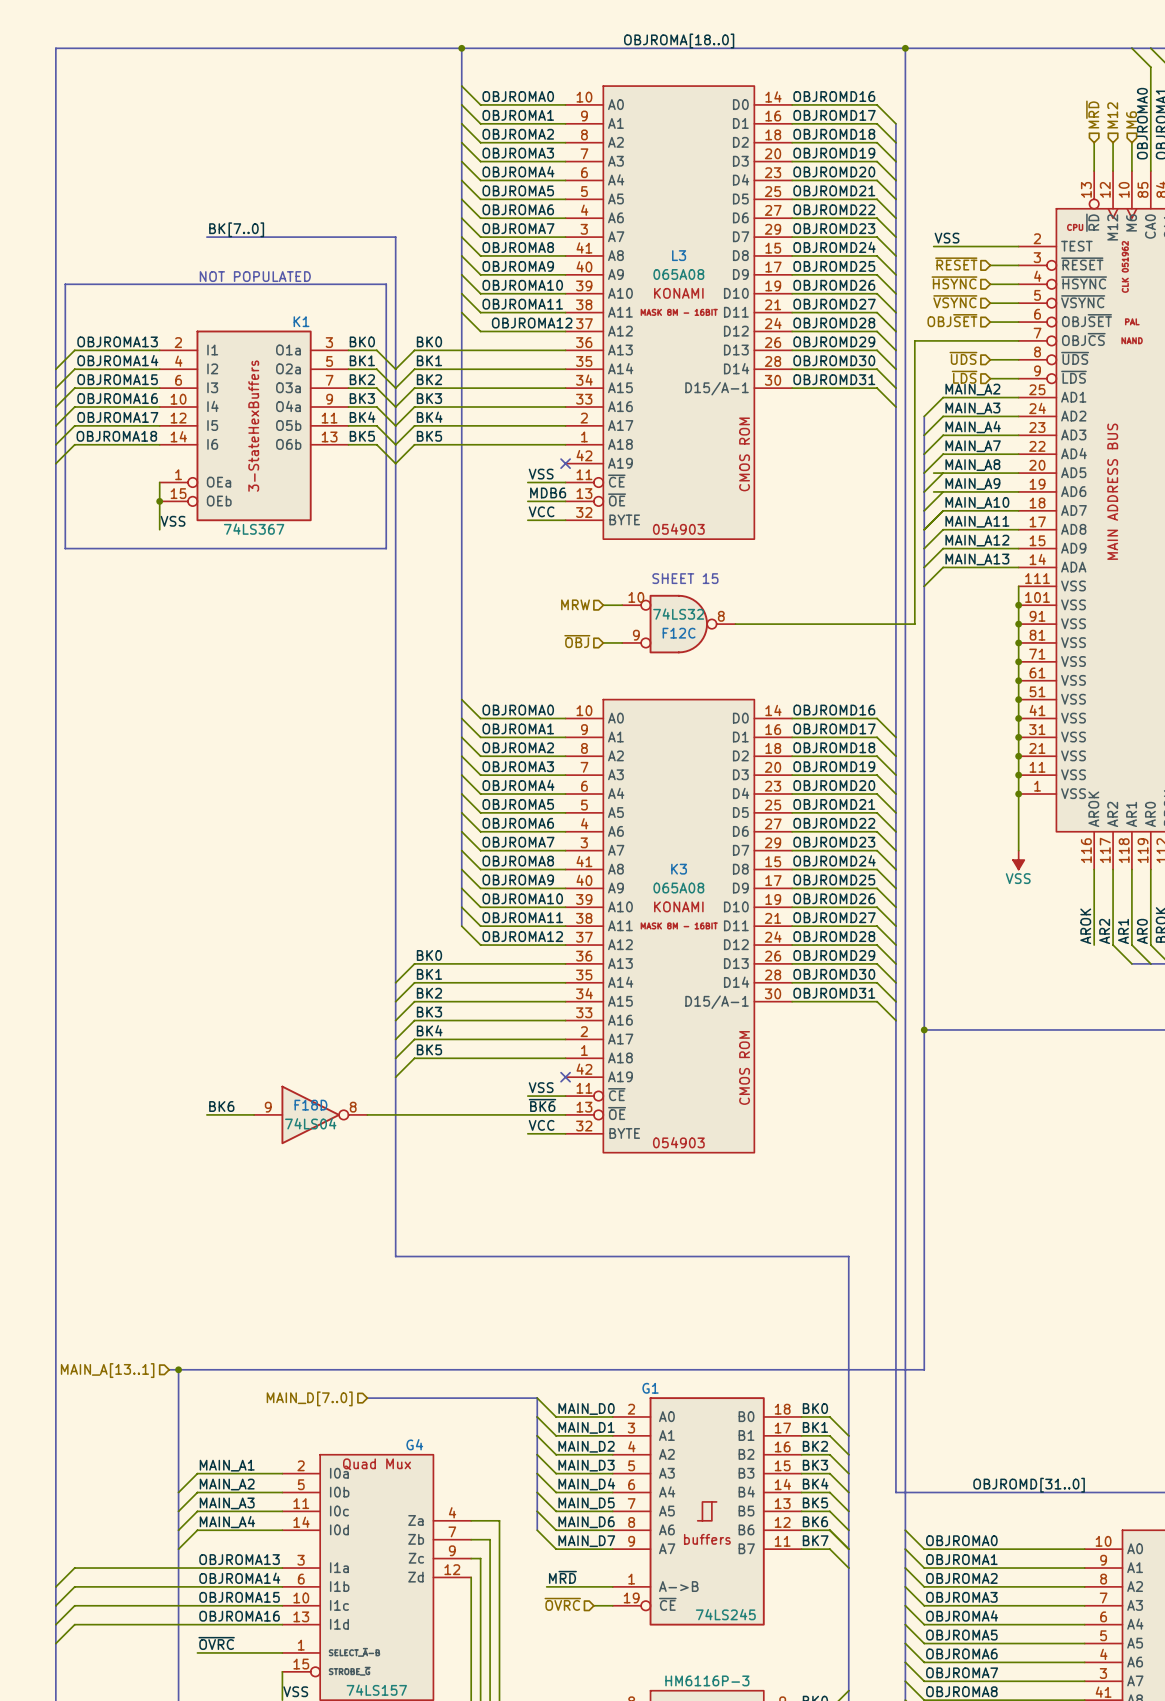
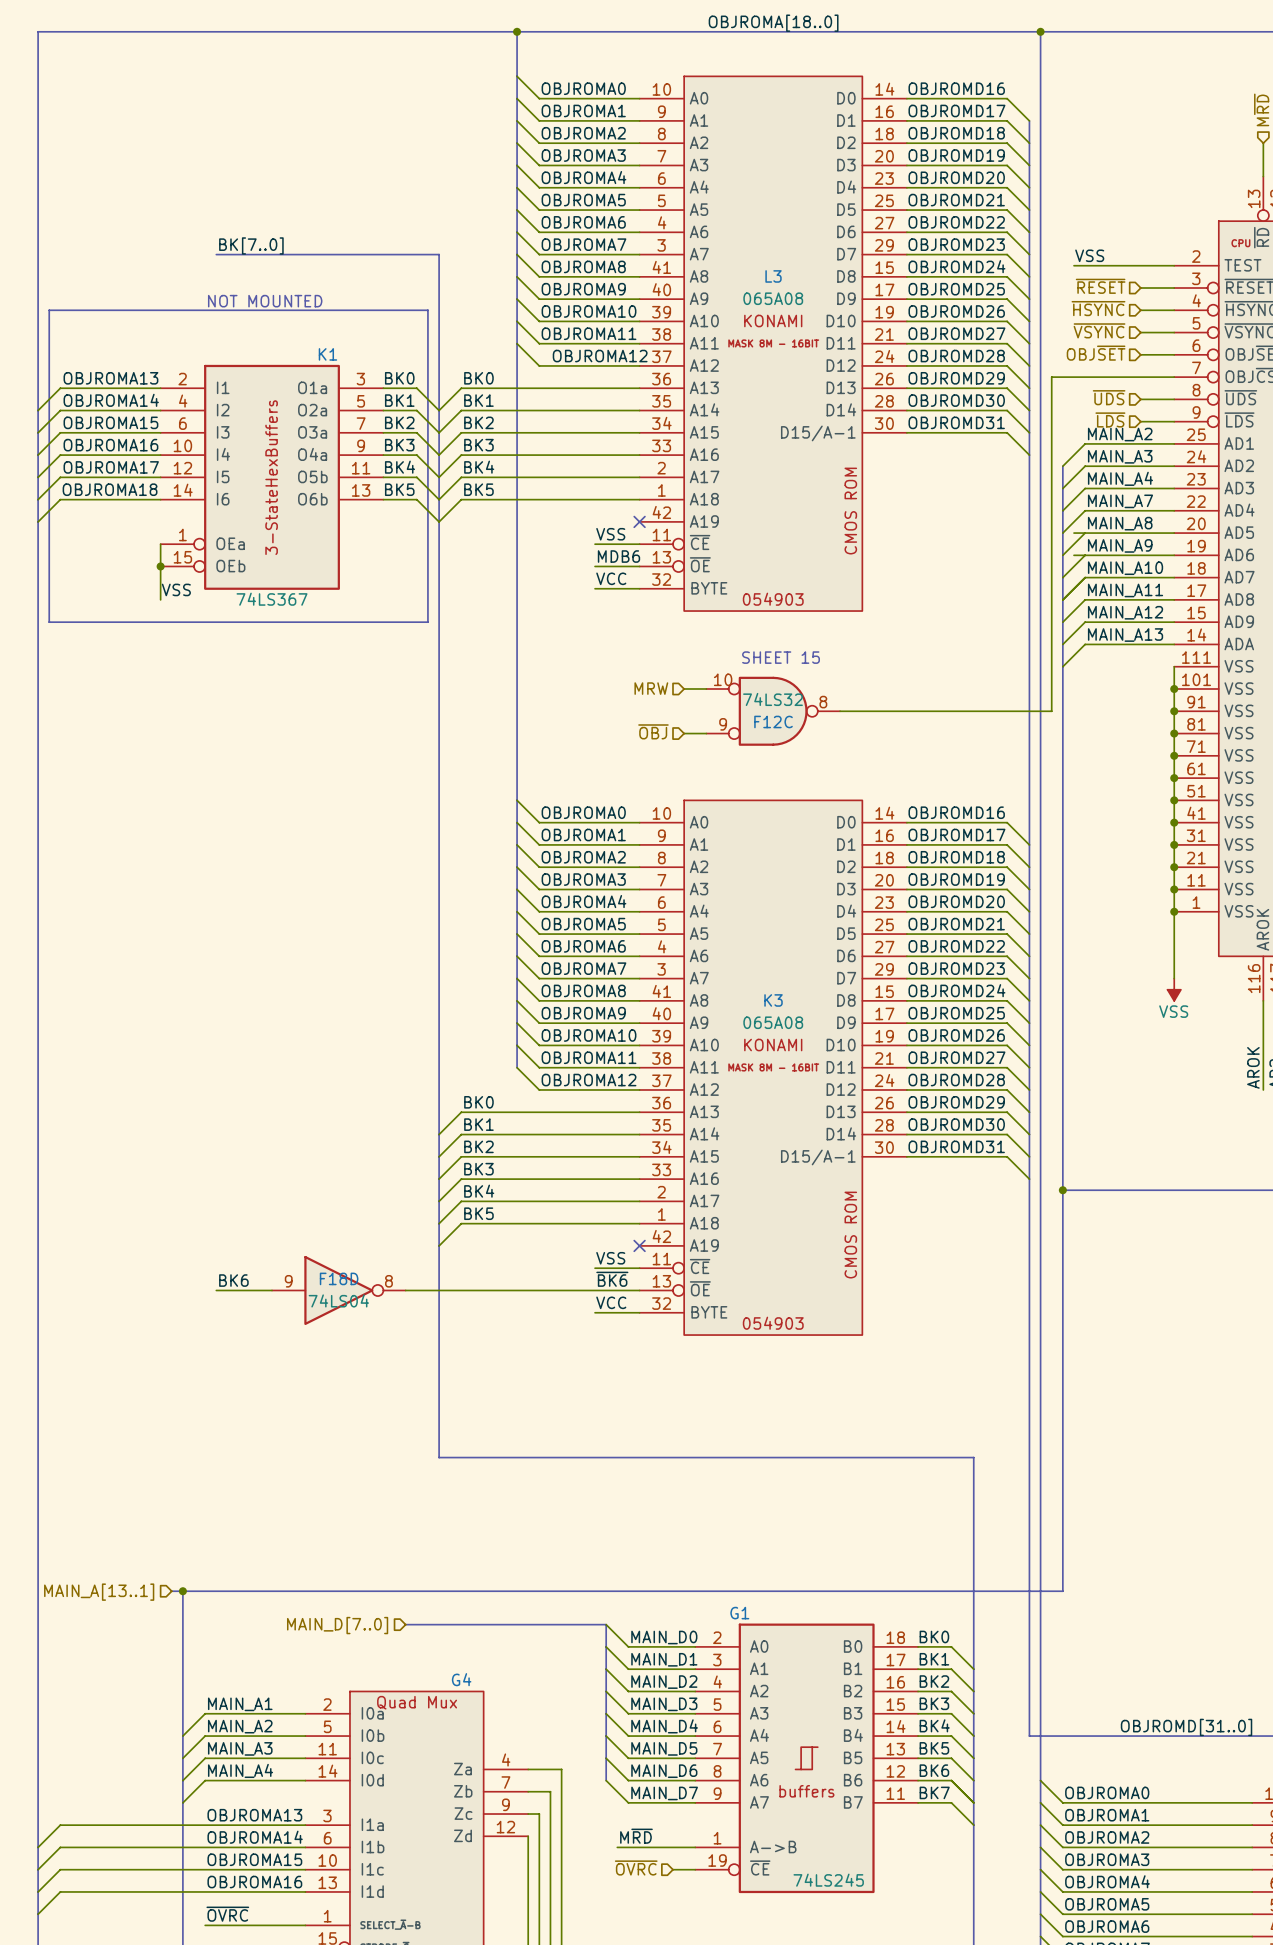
text: NOT POPULATED (255, 276) -> NOT MOUNTED (265, 301)

